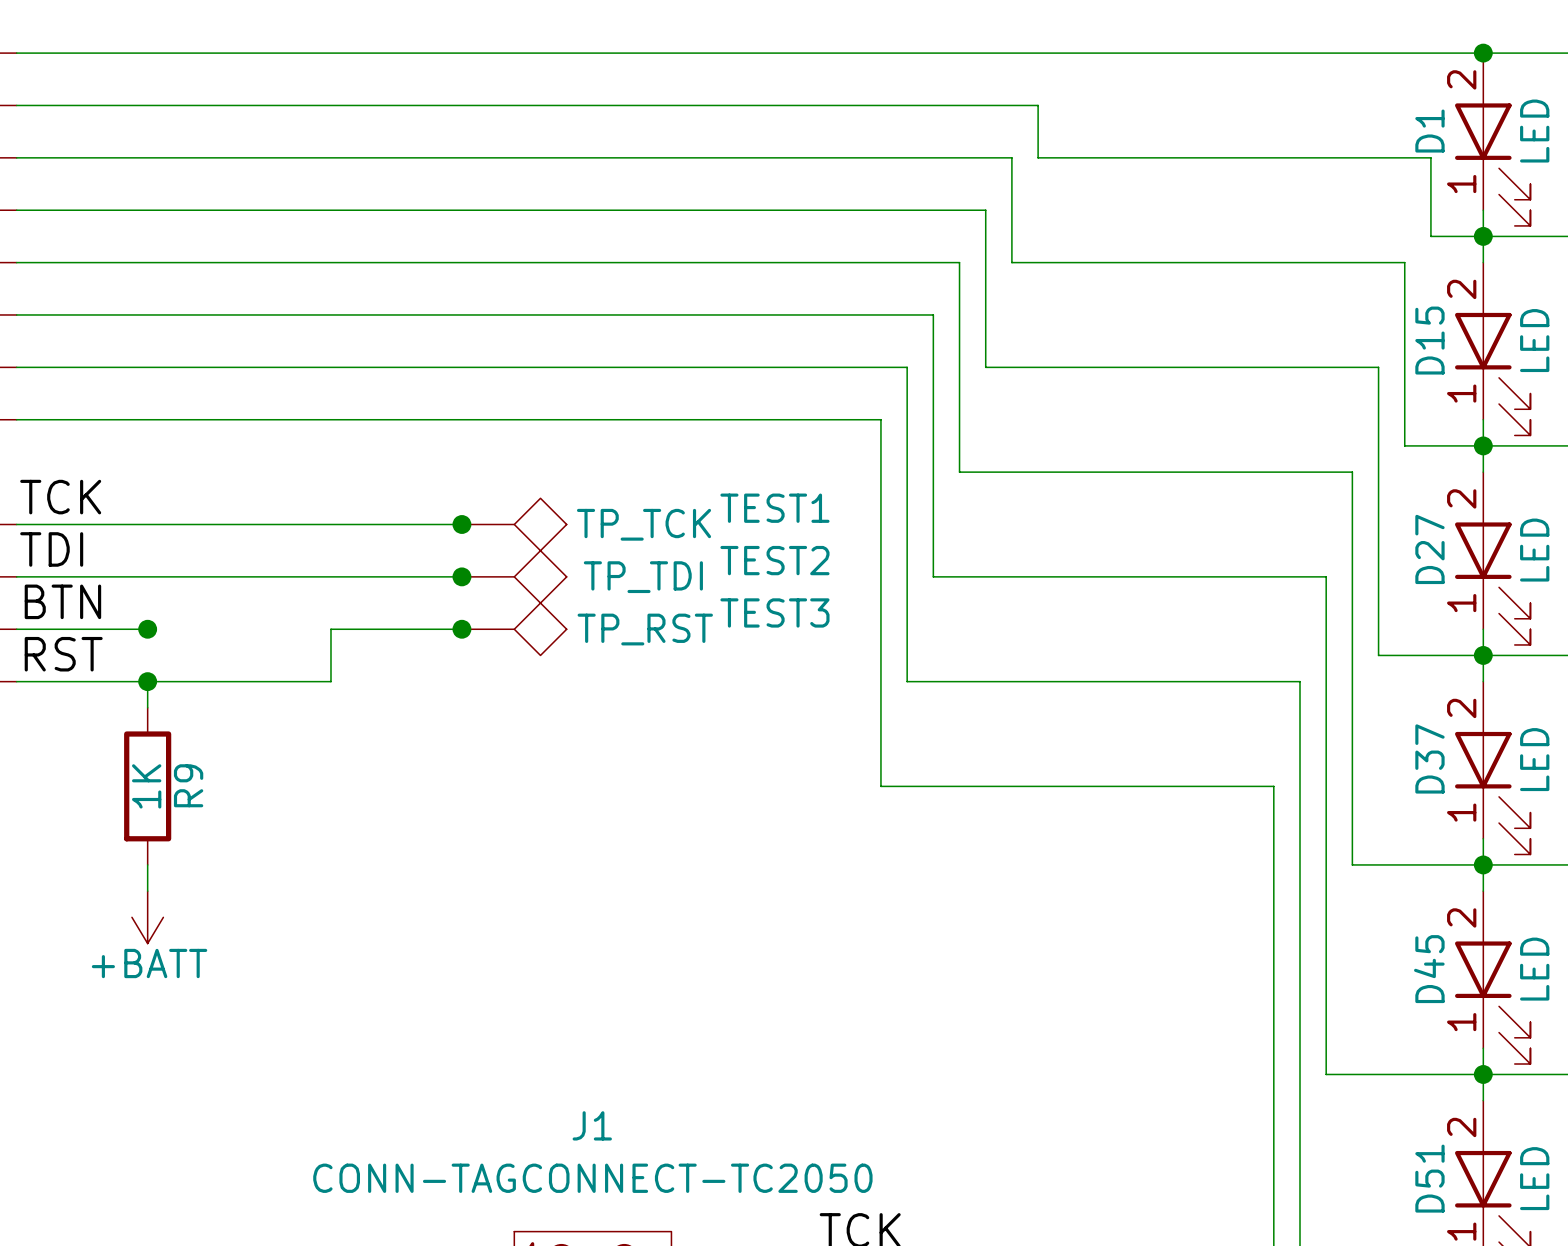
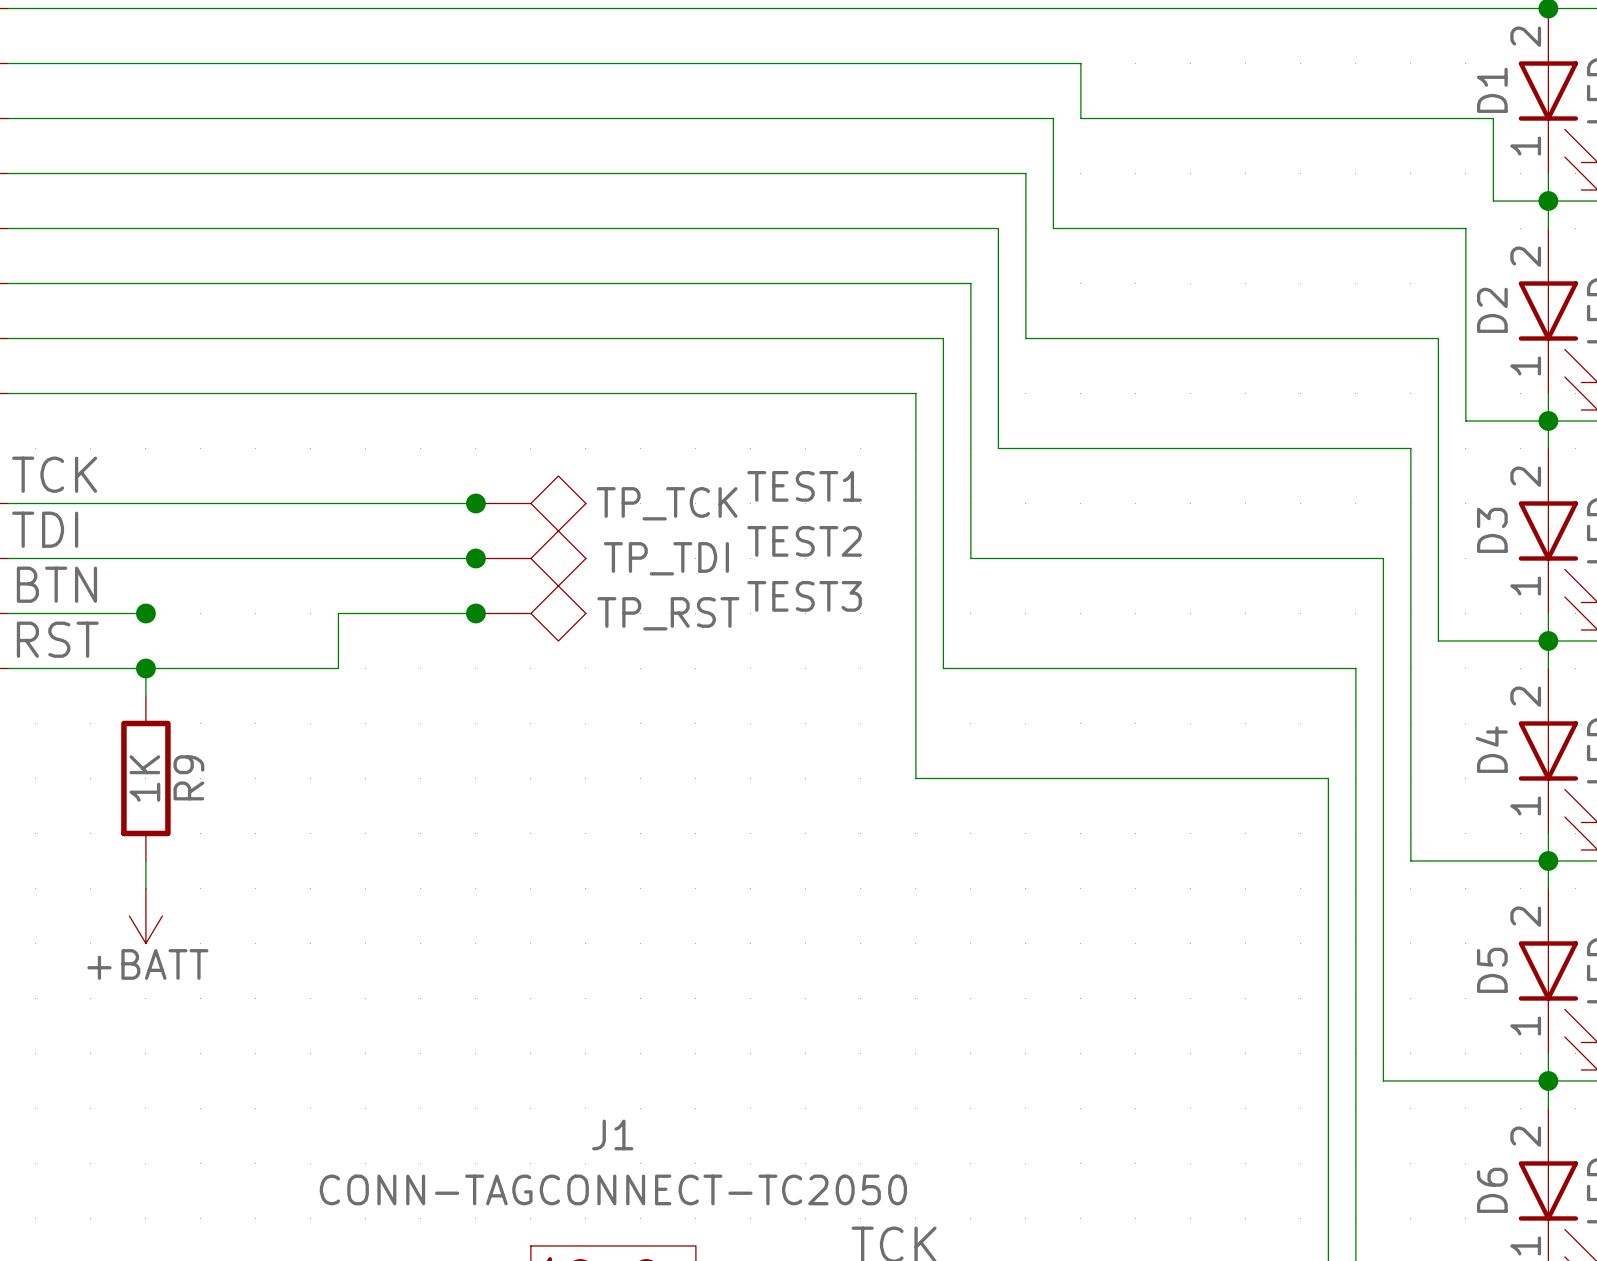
D15 name: D15 (1429, 340) -> D2 (1492, 310)
D27 name: D27 (1429, 549) -> D3 (1492, 530)
D37 name: D37 (1429, 758) -> D4 (1491, 749)
D45 name: D45 (1429, 969) -> D5 (1492, 970)
D51 name: D51 (1429, 1178) -> D6 (1492, 1190)

